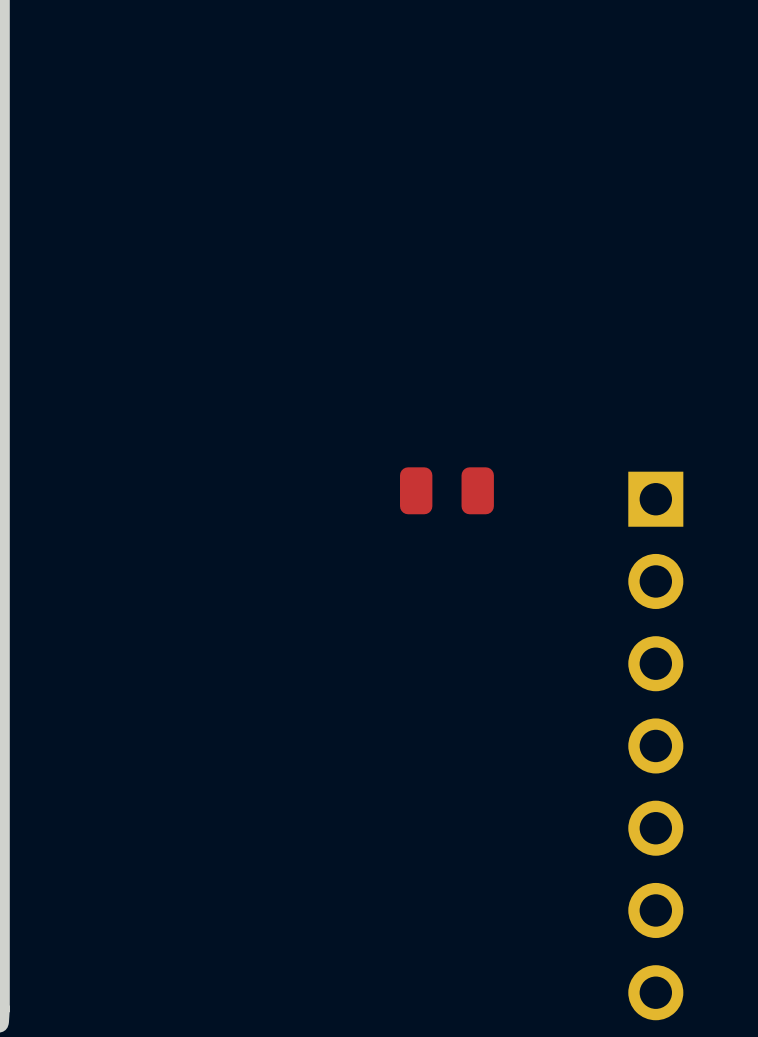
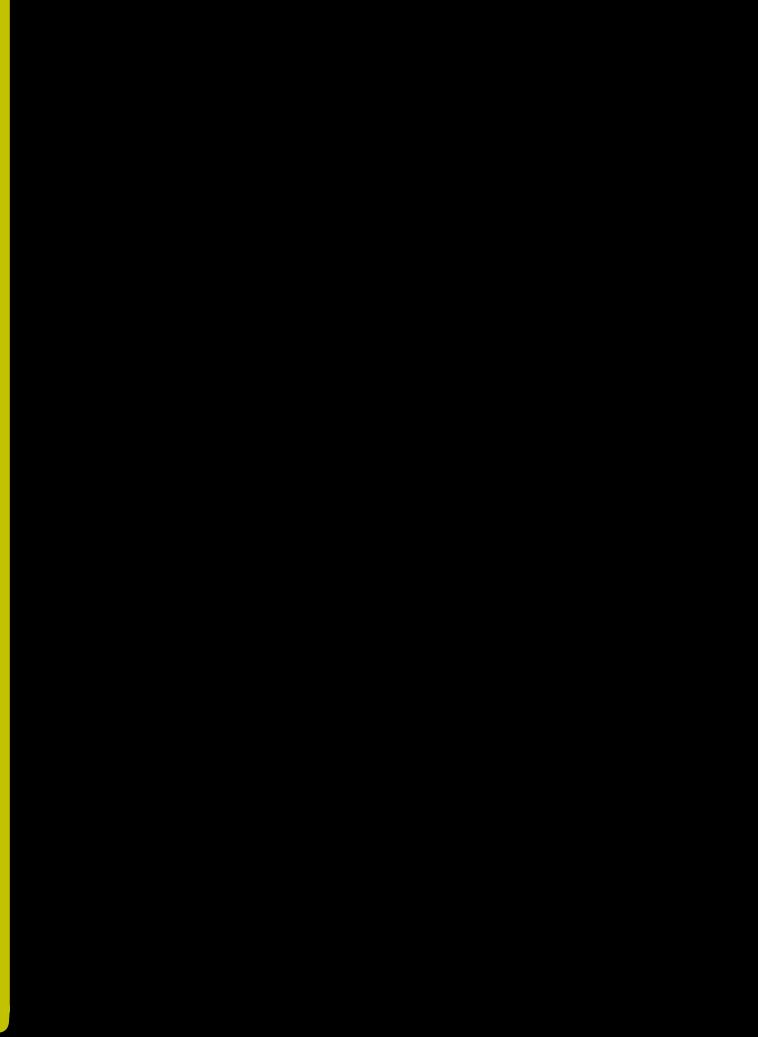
part: (446, 490) -> none
part: (655, 745) -> none

